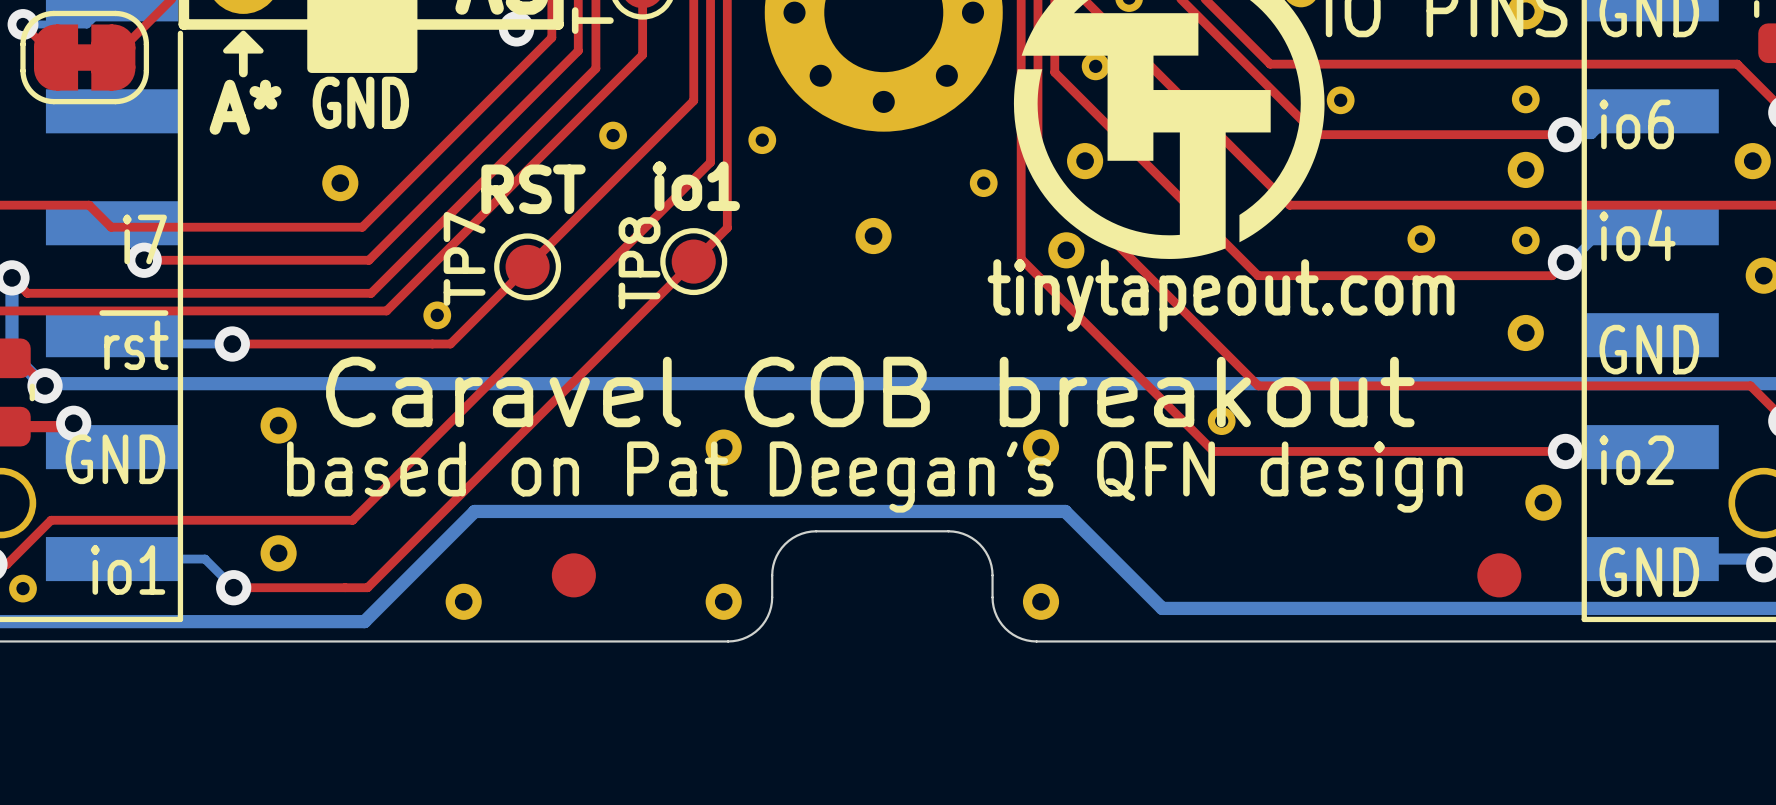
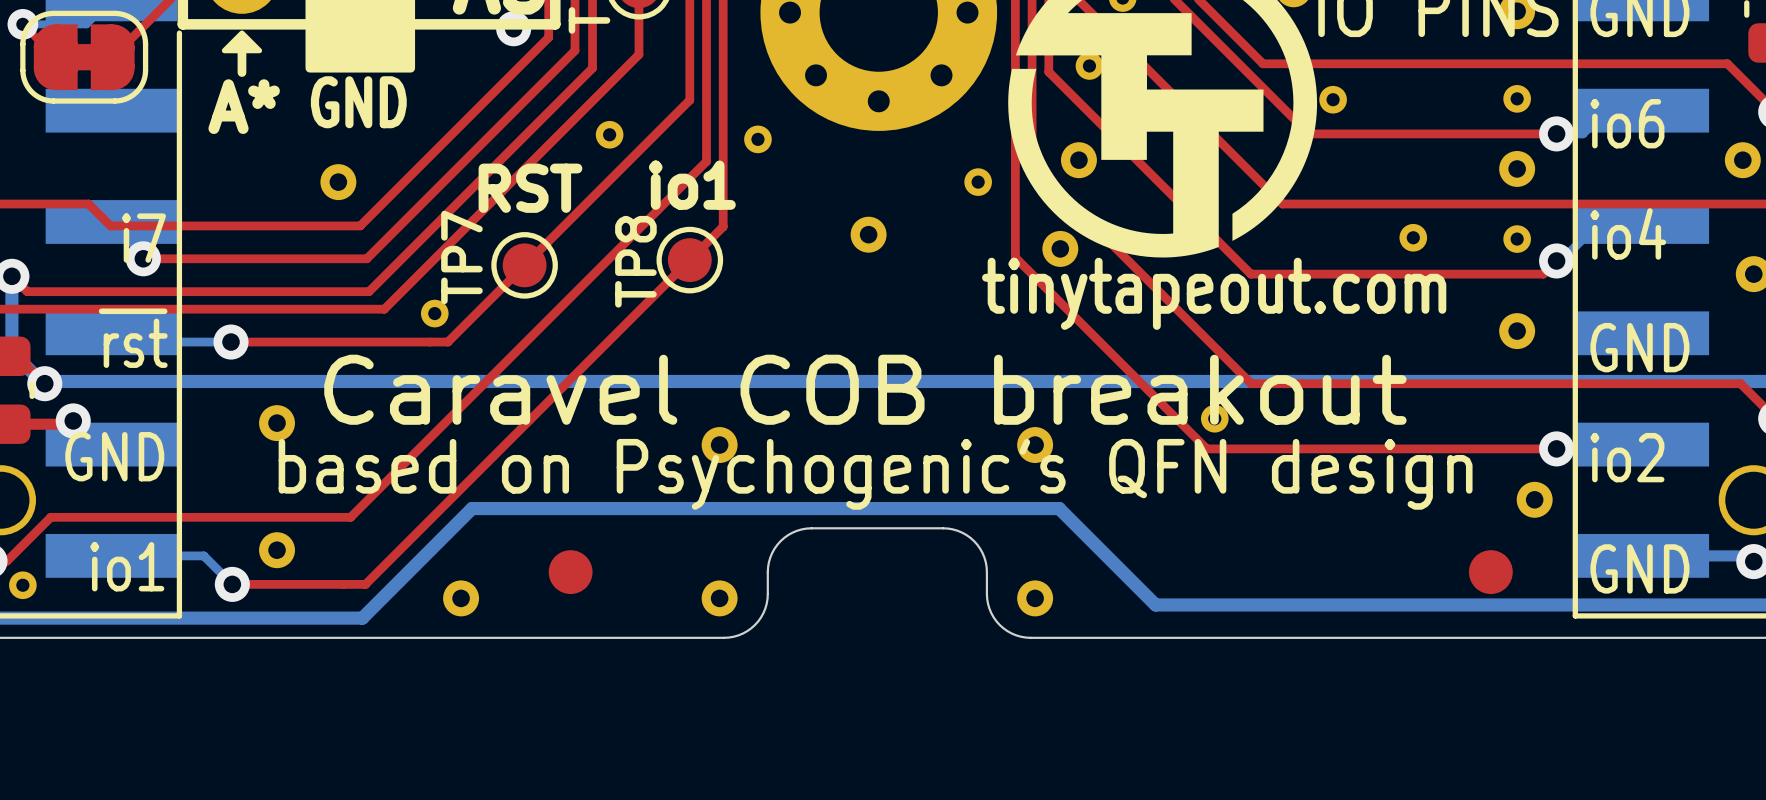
text: based on Pat Deegan's QFN design (874, 477) -> based on Psychogenic's QFN design (875, 474)

